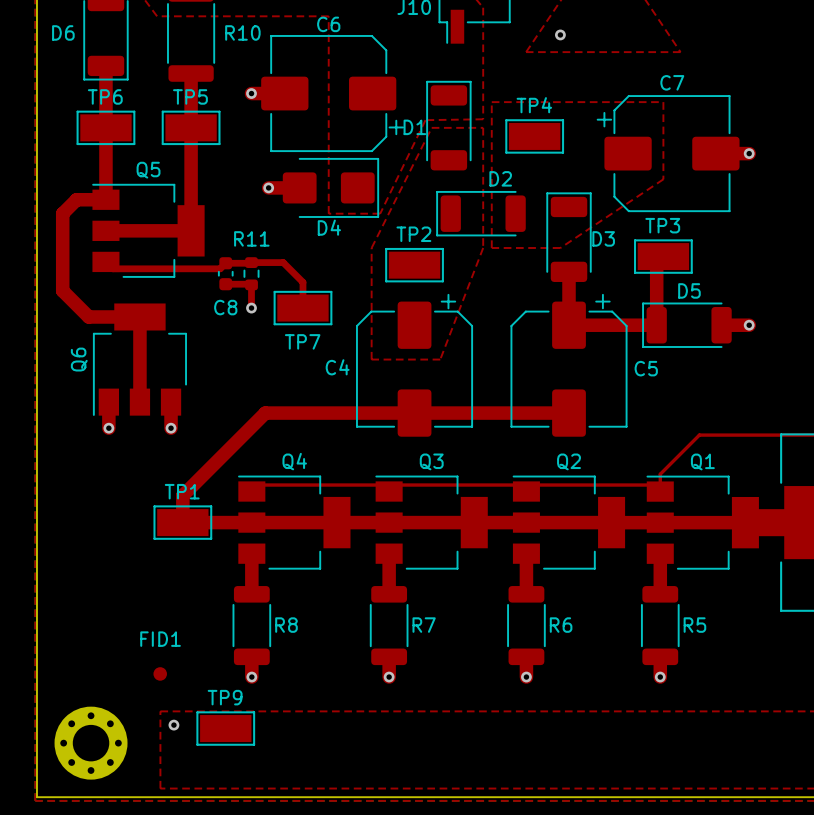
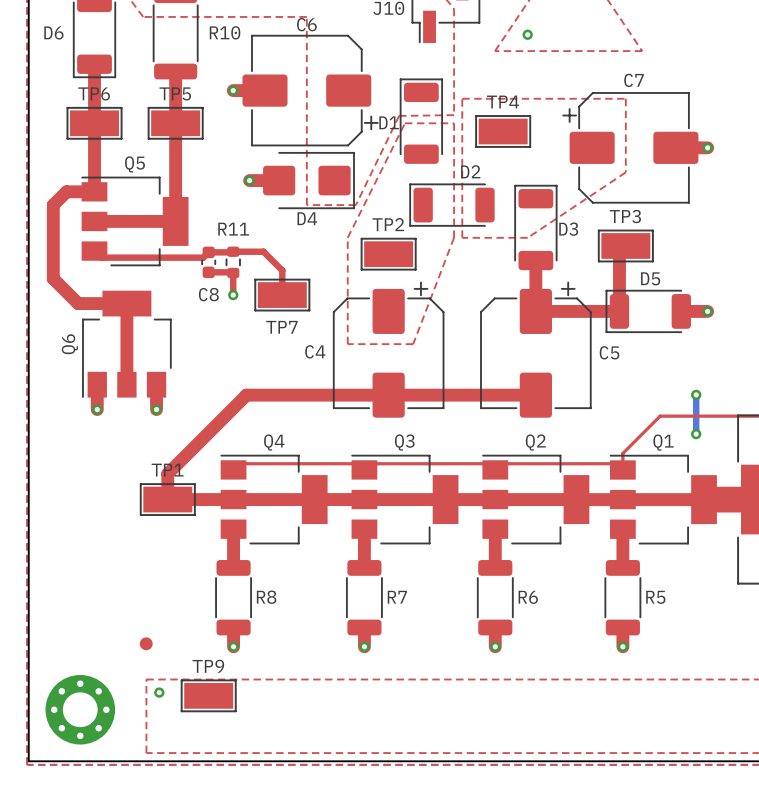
bottom track: none -> (696, 394) (696, 434)
via: none -> (696, 394)
via: none -> (696, 434)
FID1 name: FID1 (160, 639) -> none

